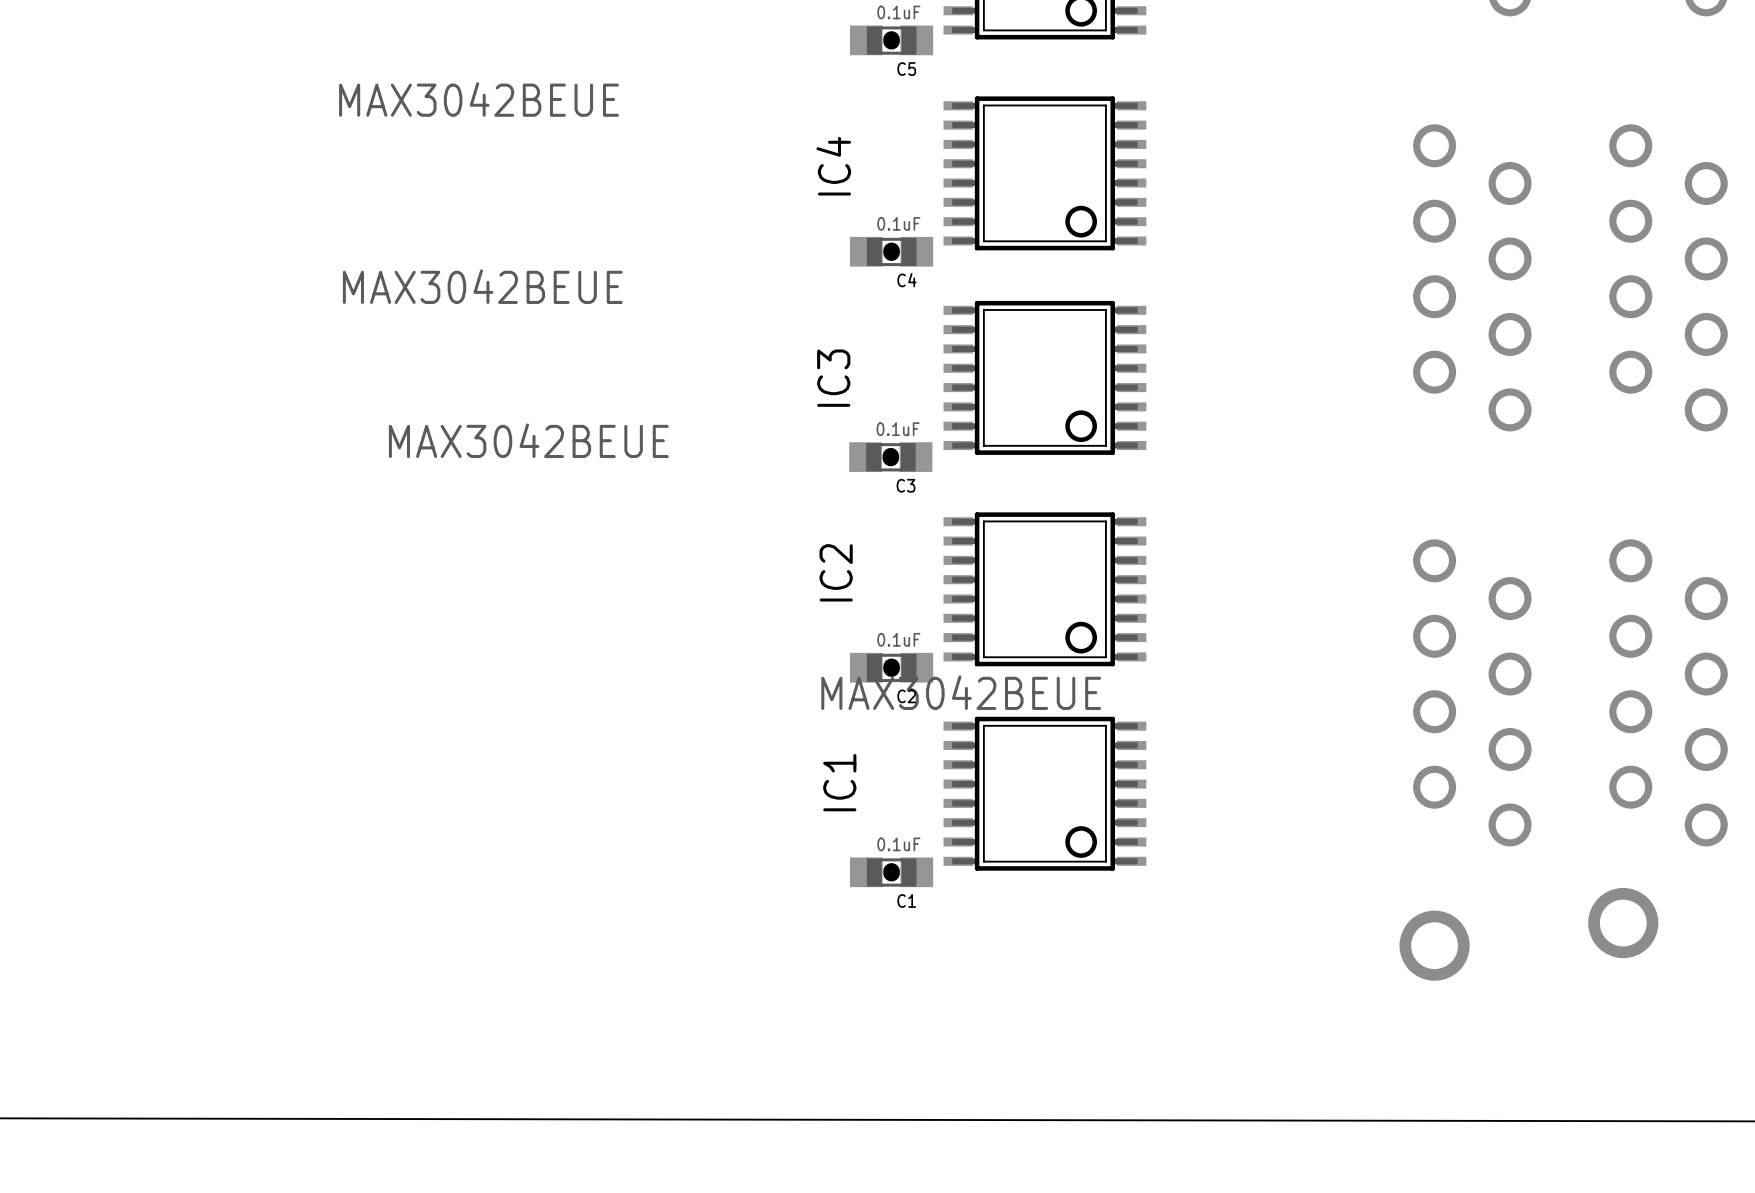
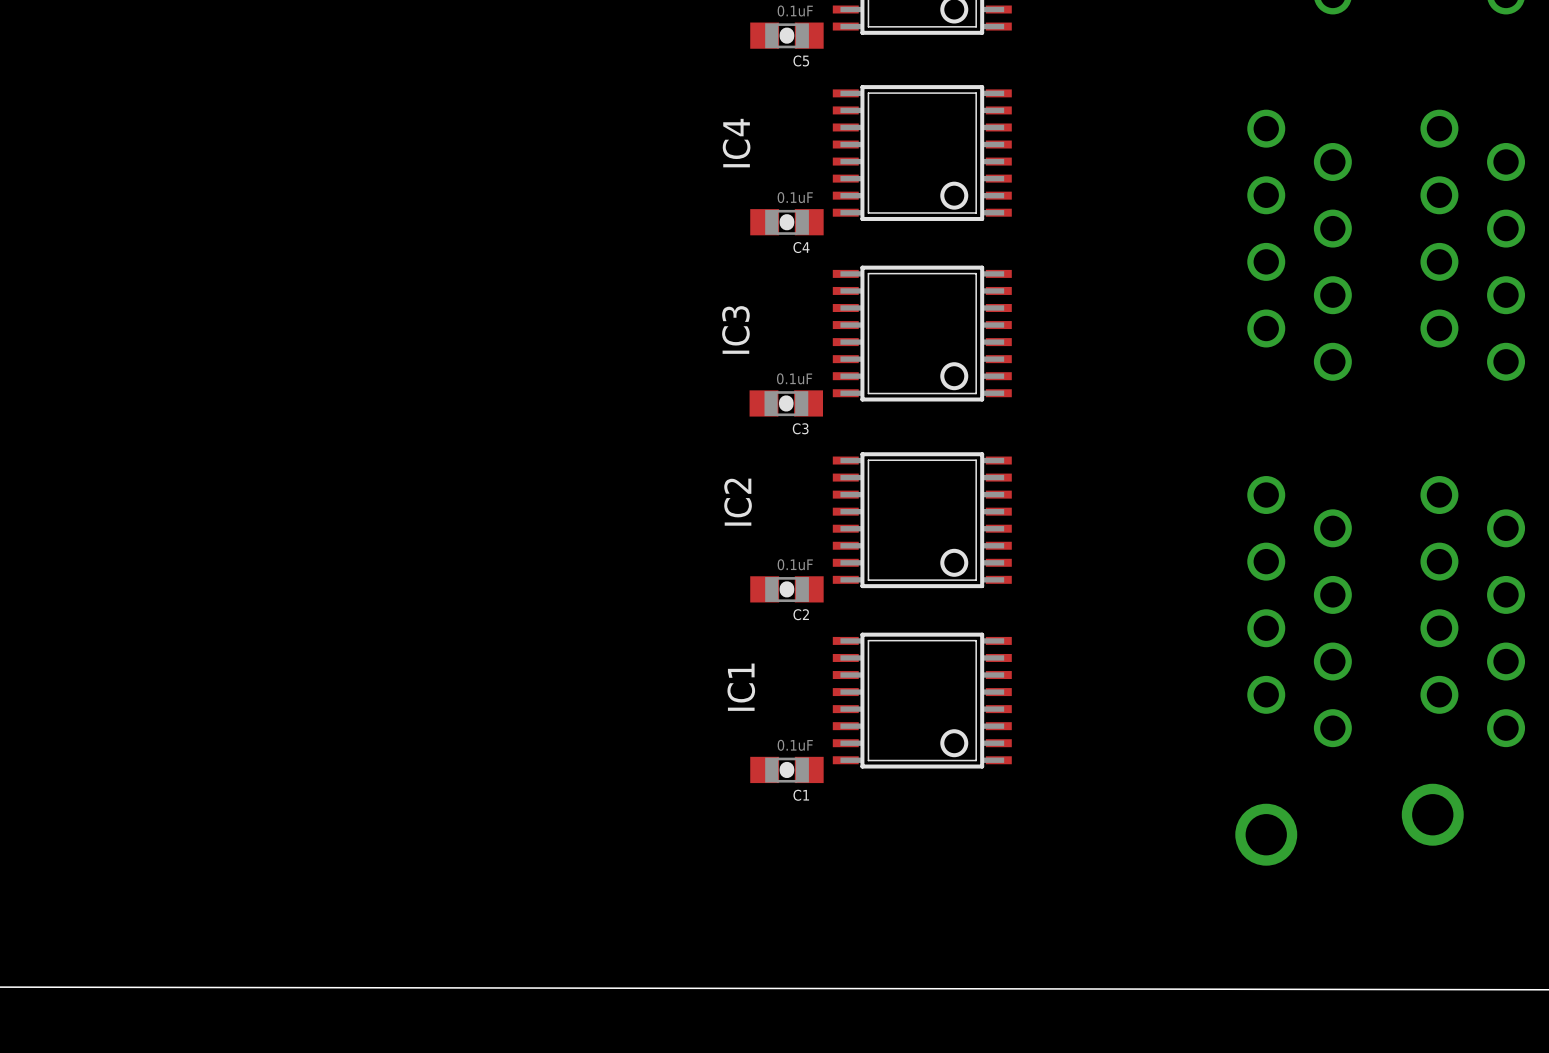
IC4 value: MAX3042BEUE (479, 99) -> none
IC3 value: MAX3042BEUE (482, 286) -> none
IC2 value: MAX3042BEUE (528, 440) -> none
IC1 value: MAX3042BEUE (961, 692) -> none

